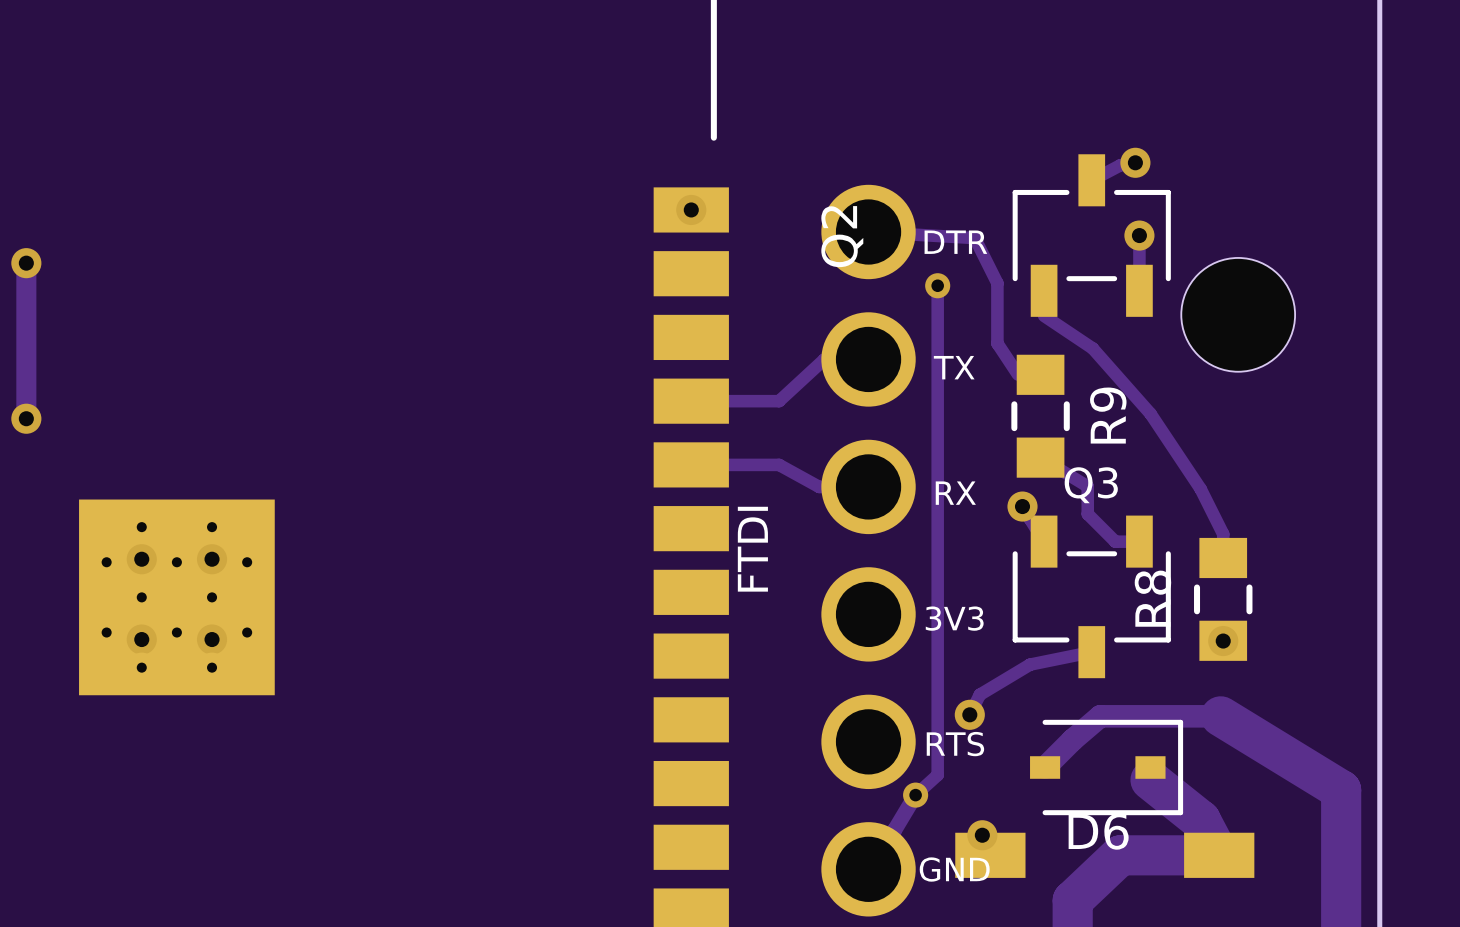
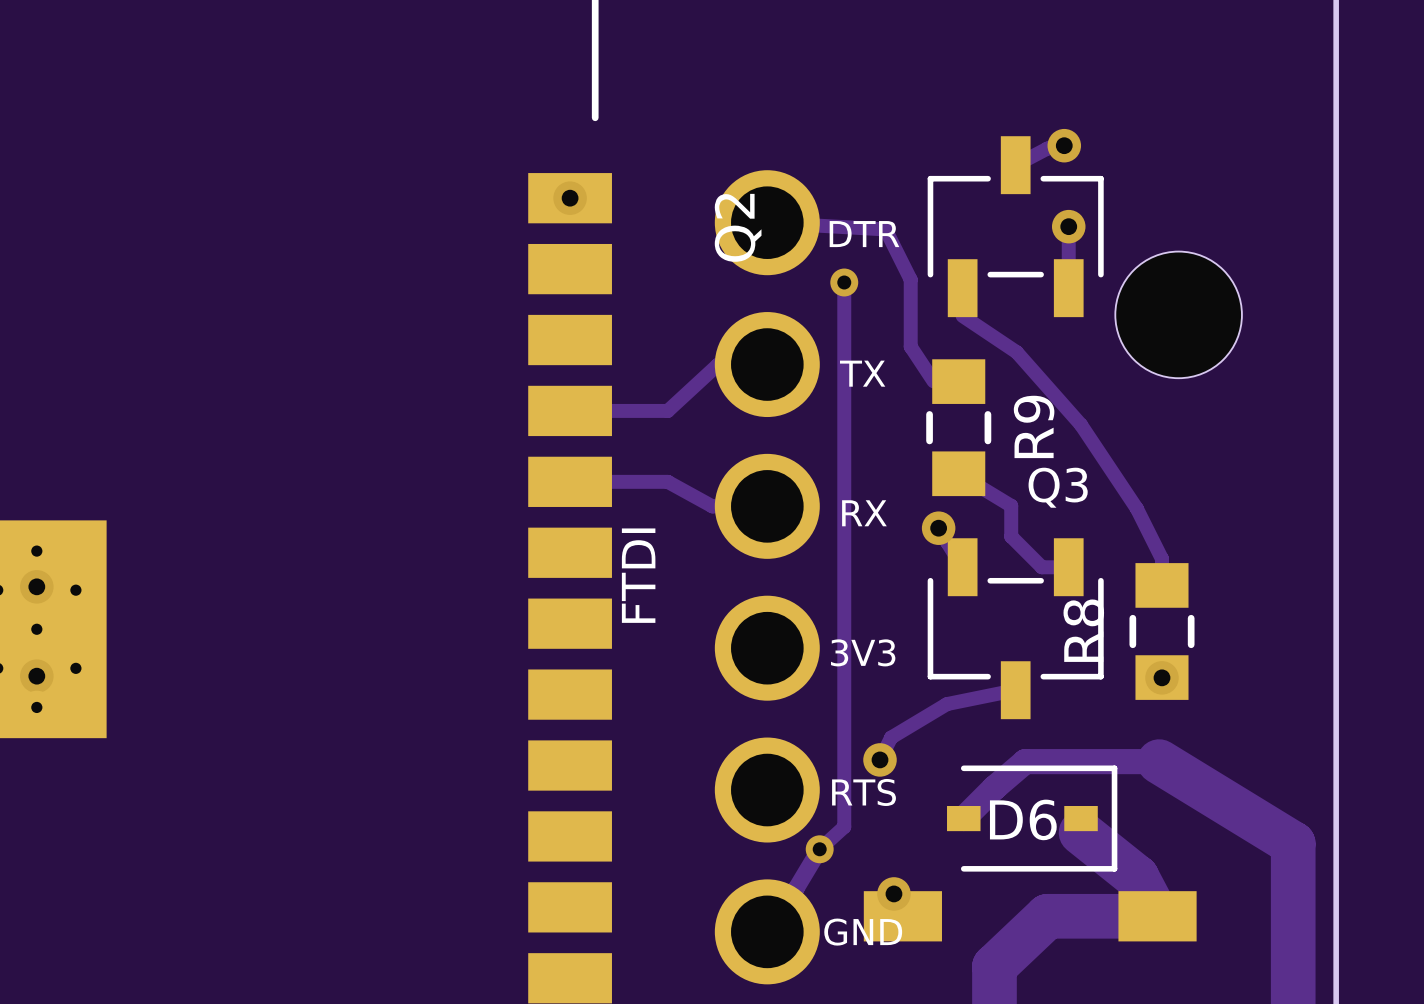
Q3 name position: Q3 (1091, 485) -> Q3 (1058, 487)
D6 name position: D6 (1098, 831) -> D6 (1023, 819)

